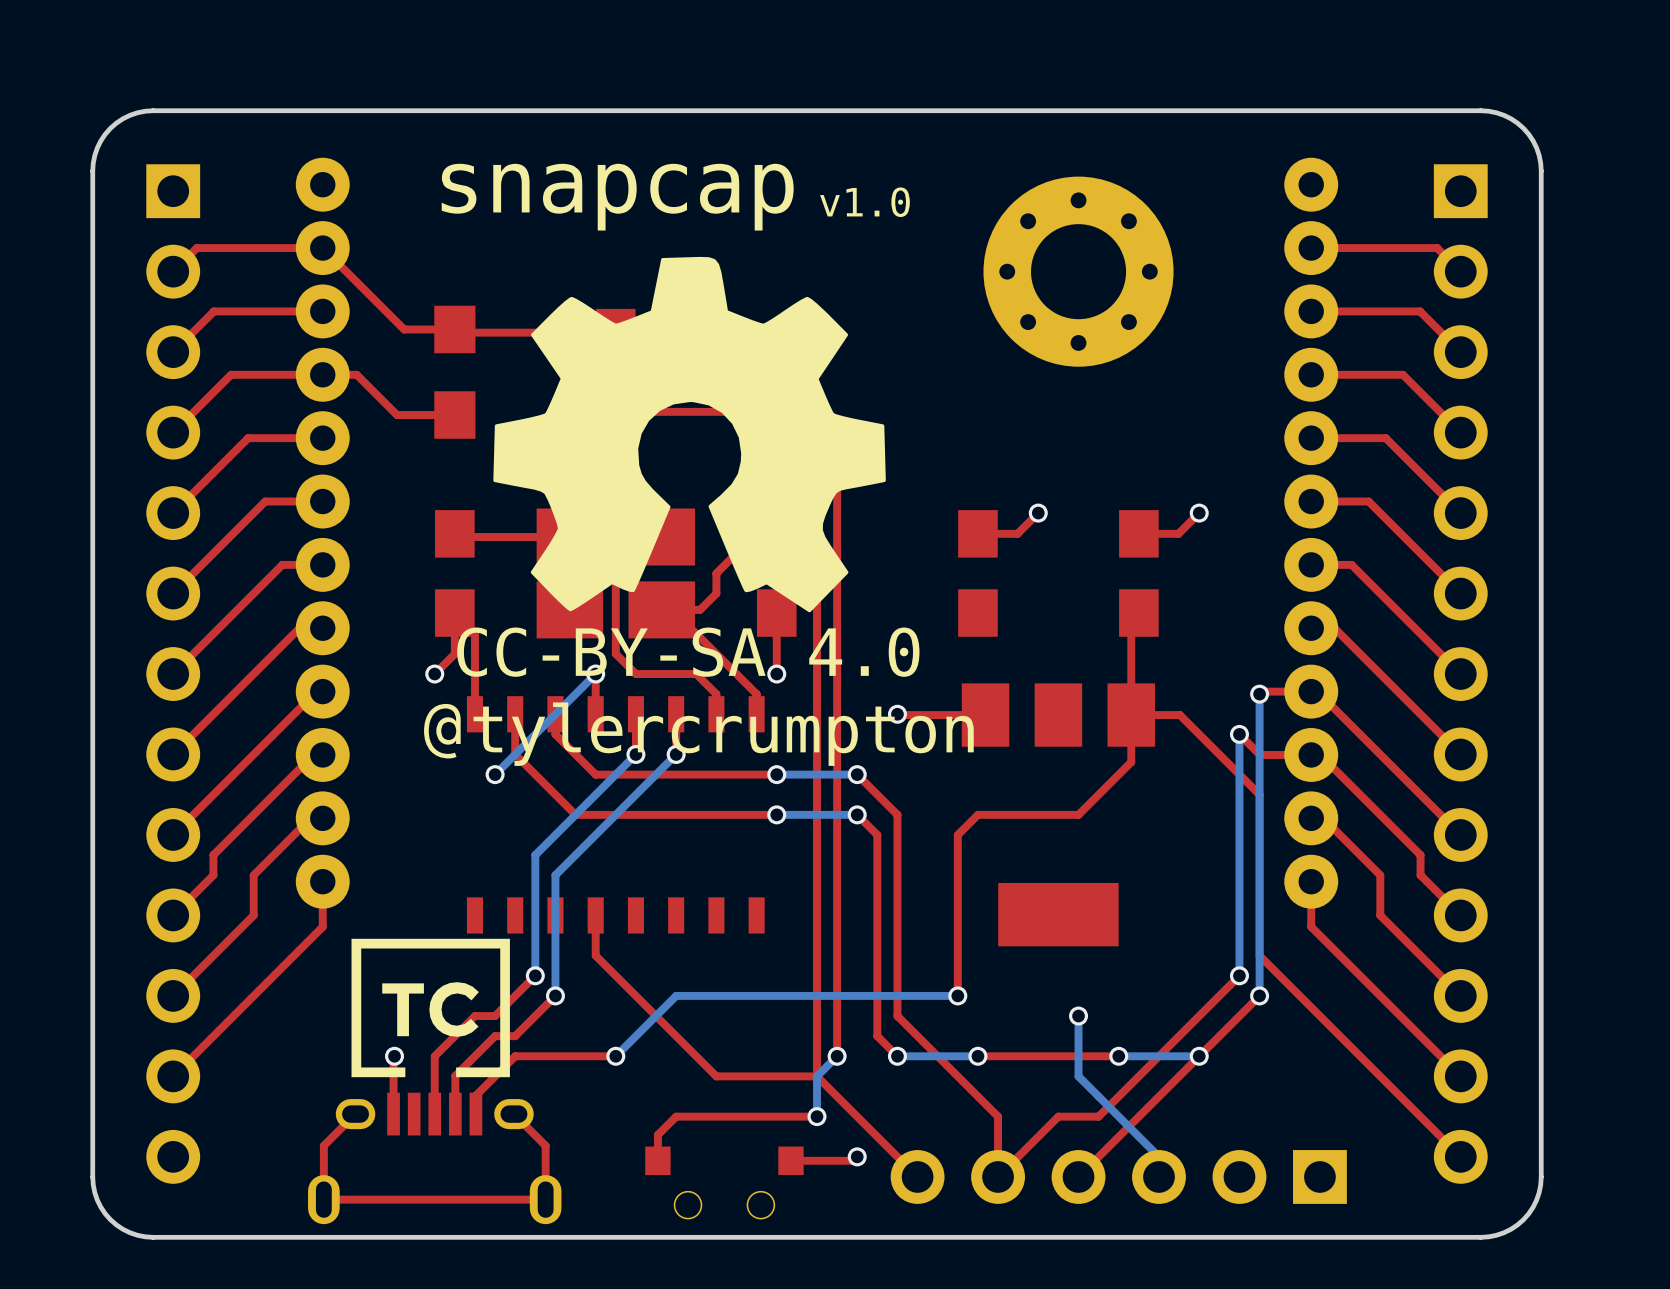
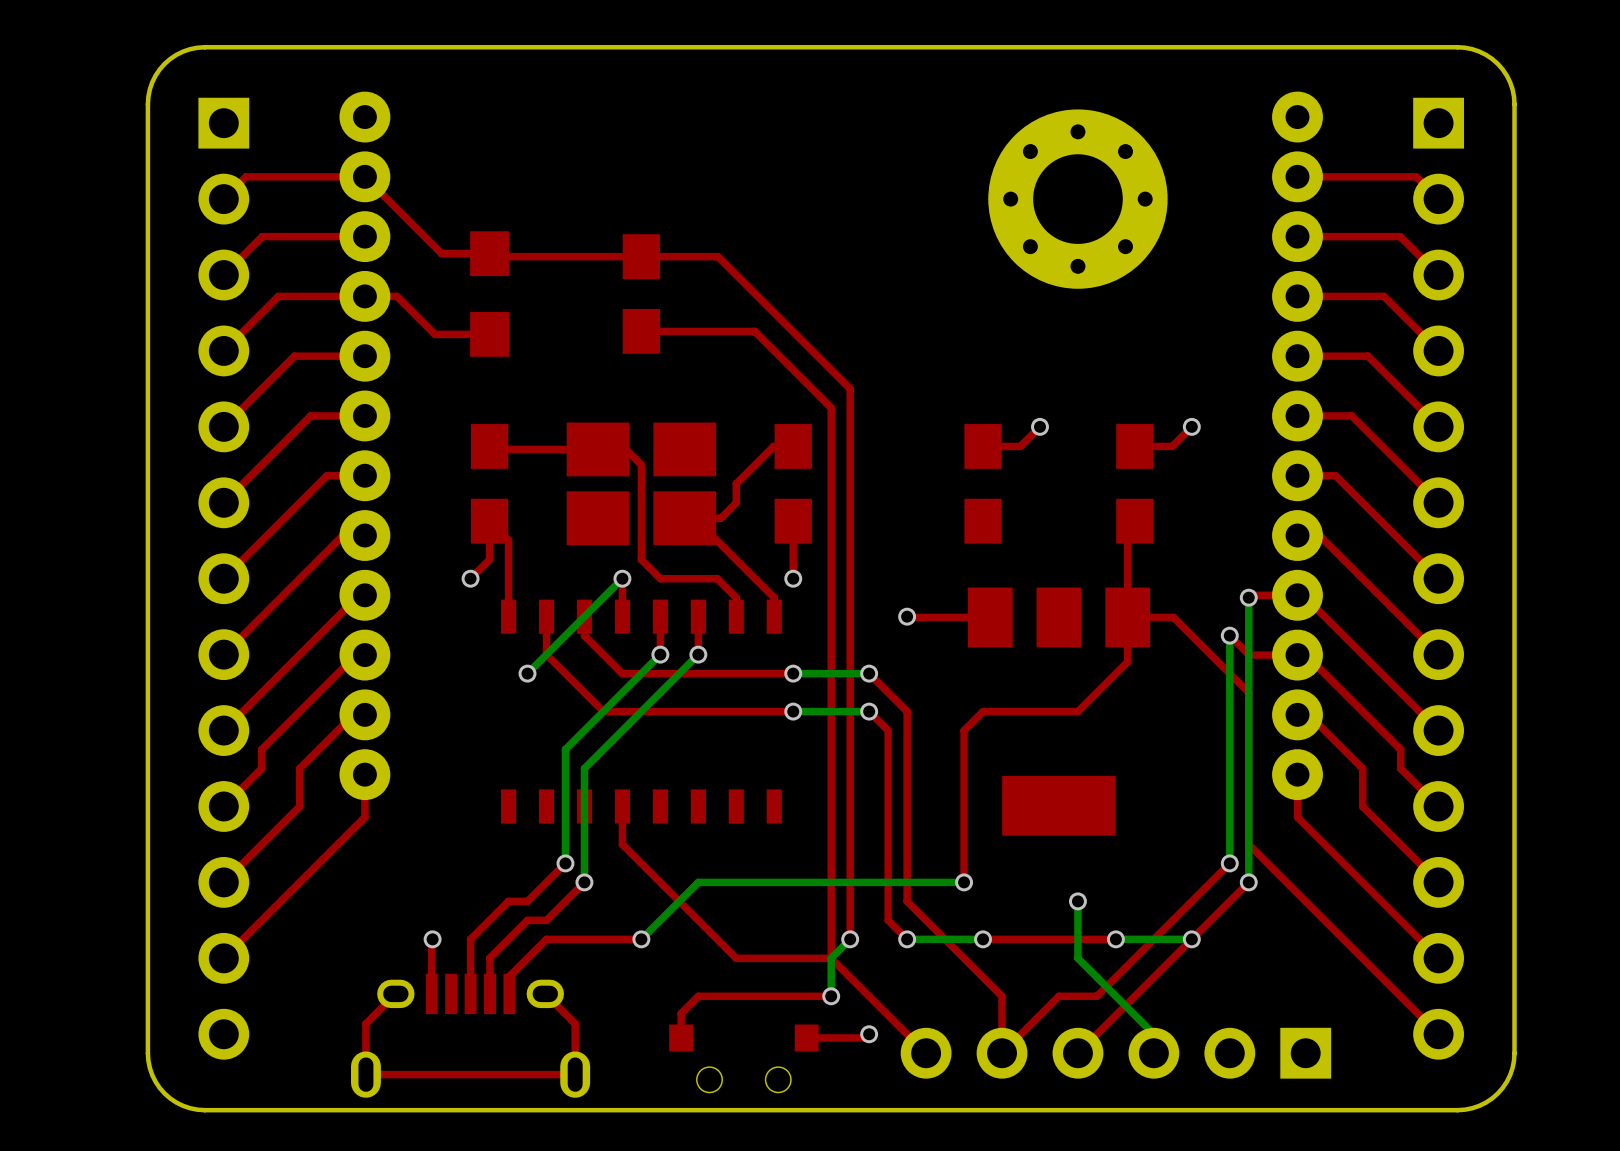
text: snapcap (617, 197) -> none
text: v1.0 (864, 202) -> none
drawing: [493, 256, 886, 613] -> none
text: CC-BY-SA 4.0 (688, 652) -> none
text: @ (442, 731) -> none
text: tylercrumpton (723, 734) -> none
drawing: [351, 938, 510, 1078] -> none

